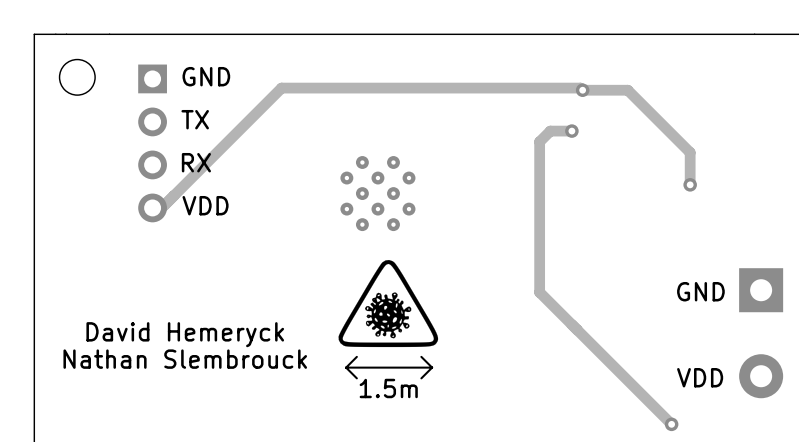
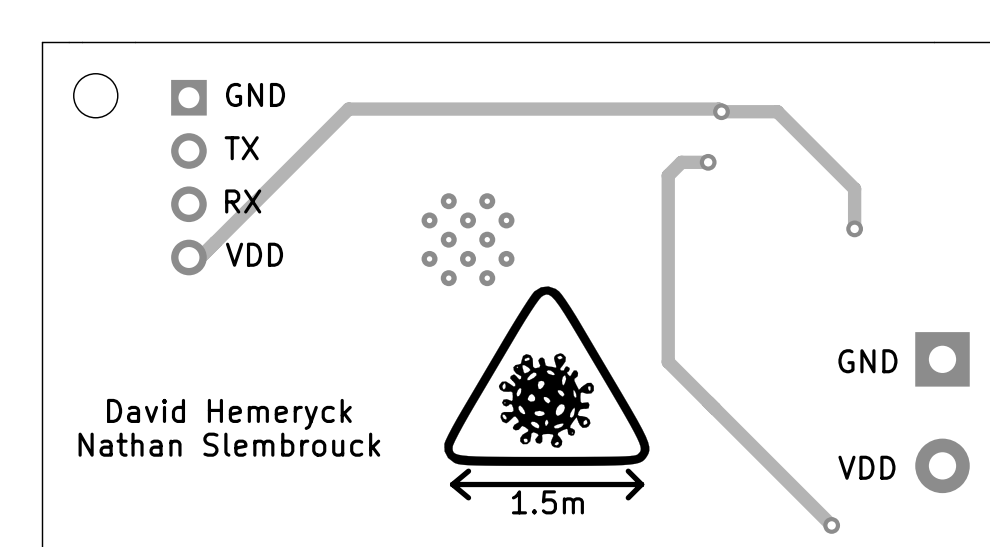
drawing: none -> [444, 286, 650, 466]
drawing: [338, 259, 439, 348] -> none
line: (356, 356) (346, 367) -> none
line: (421, 356) (432, 367) -> (628, 471) (641, 484)
line: (346, 367) (356, 378) -> none
line: (432, 367) (421, 378) -> (641, 484) (628, 497)
line: (432, 367) (346, 367) -> none
line: none -> (468, 471) (452, 484)
text position: 1.5m (388, 388) -> 1.5m (547, 502)
line: none -> (452, 484) (468, 497)
line: none -> (641, 484) (452, 484)

